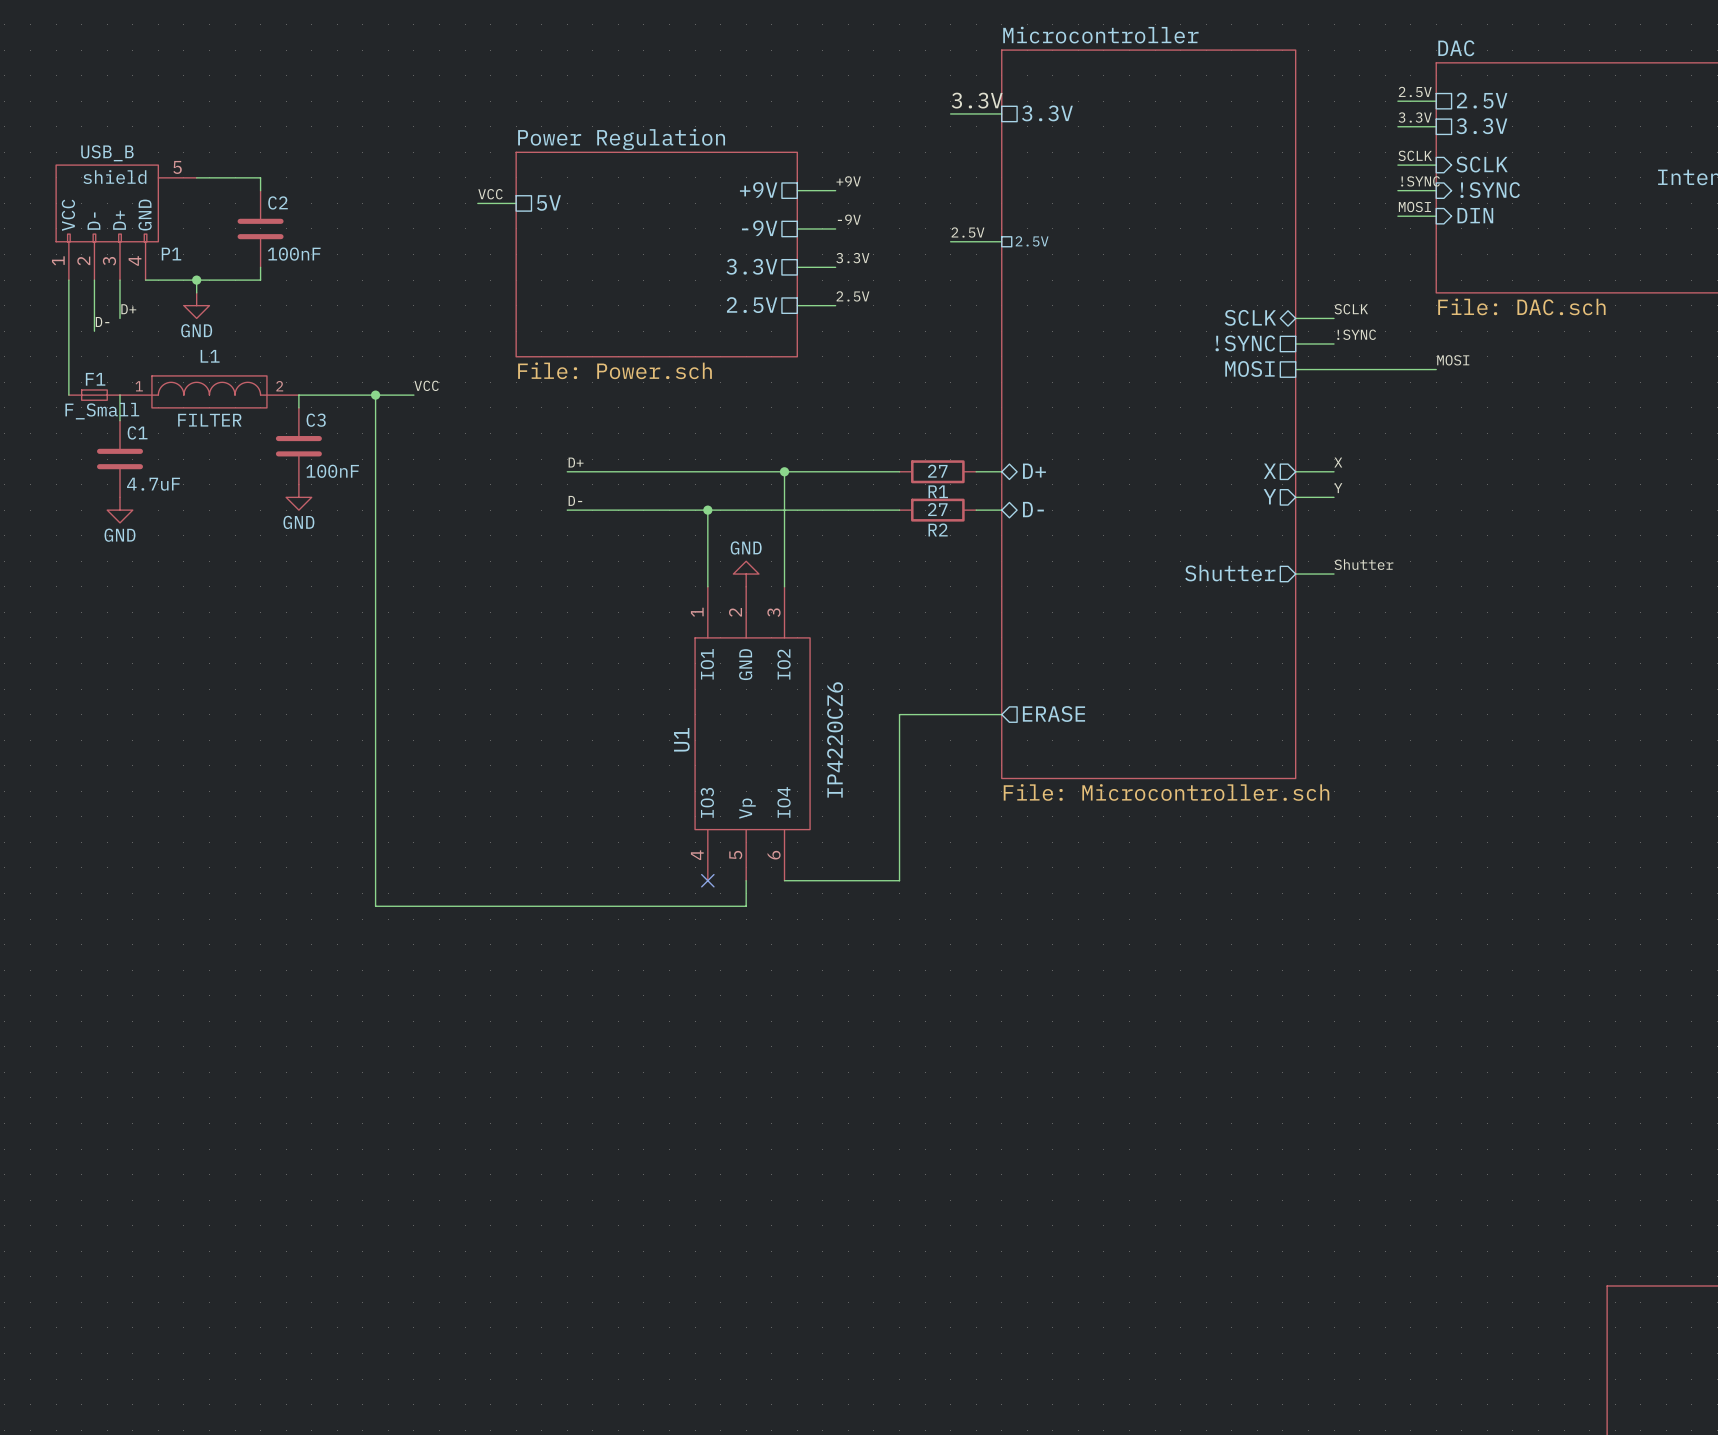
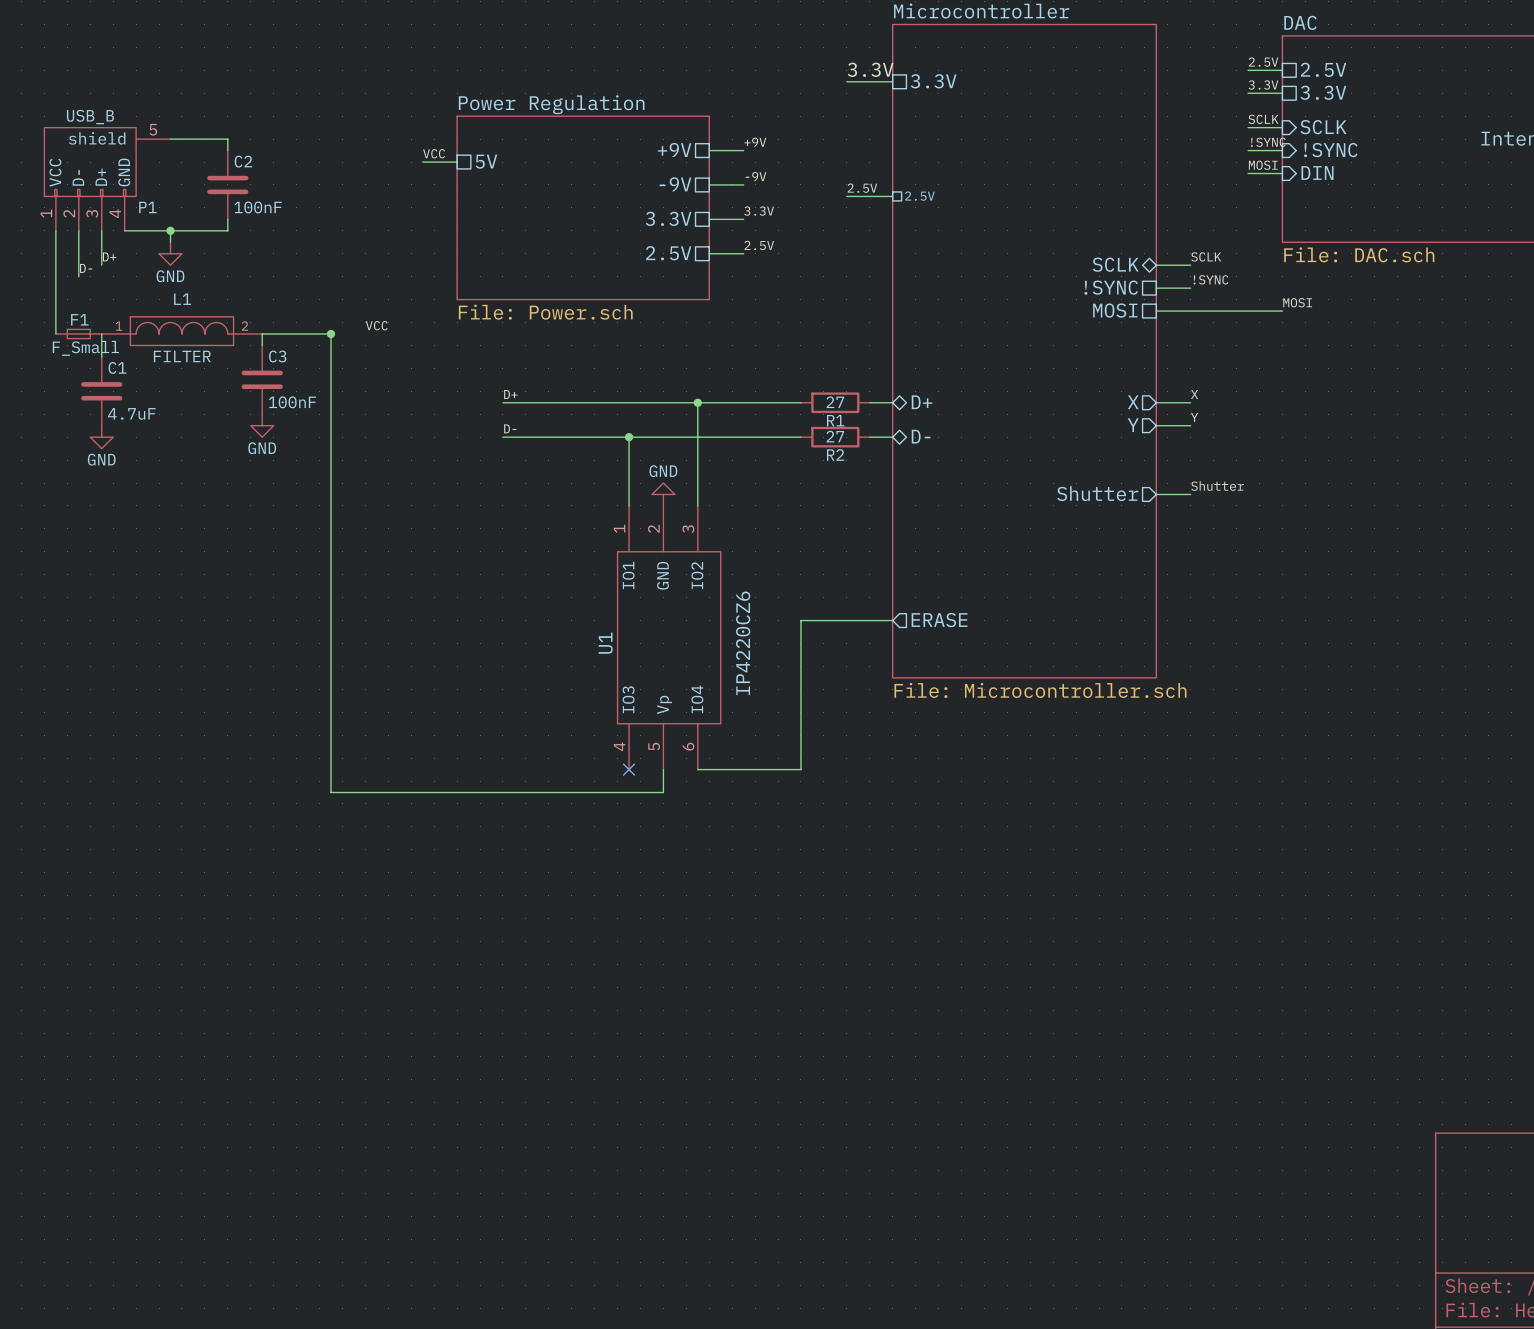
wire: (375, 395) (413, 395) -> none

